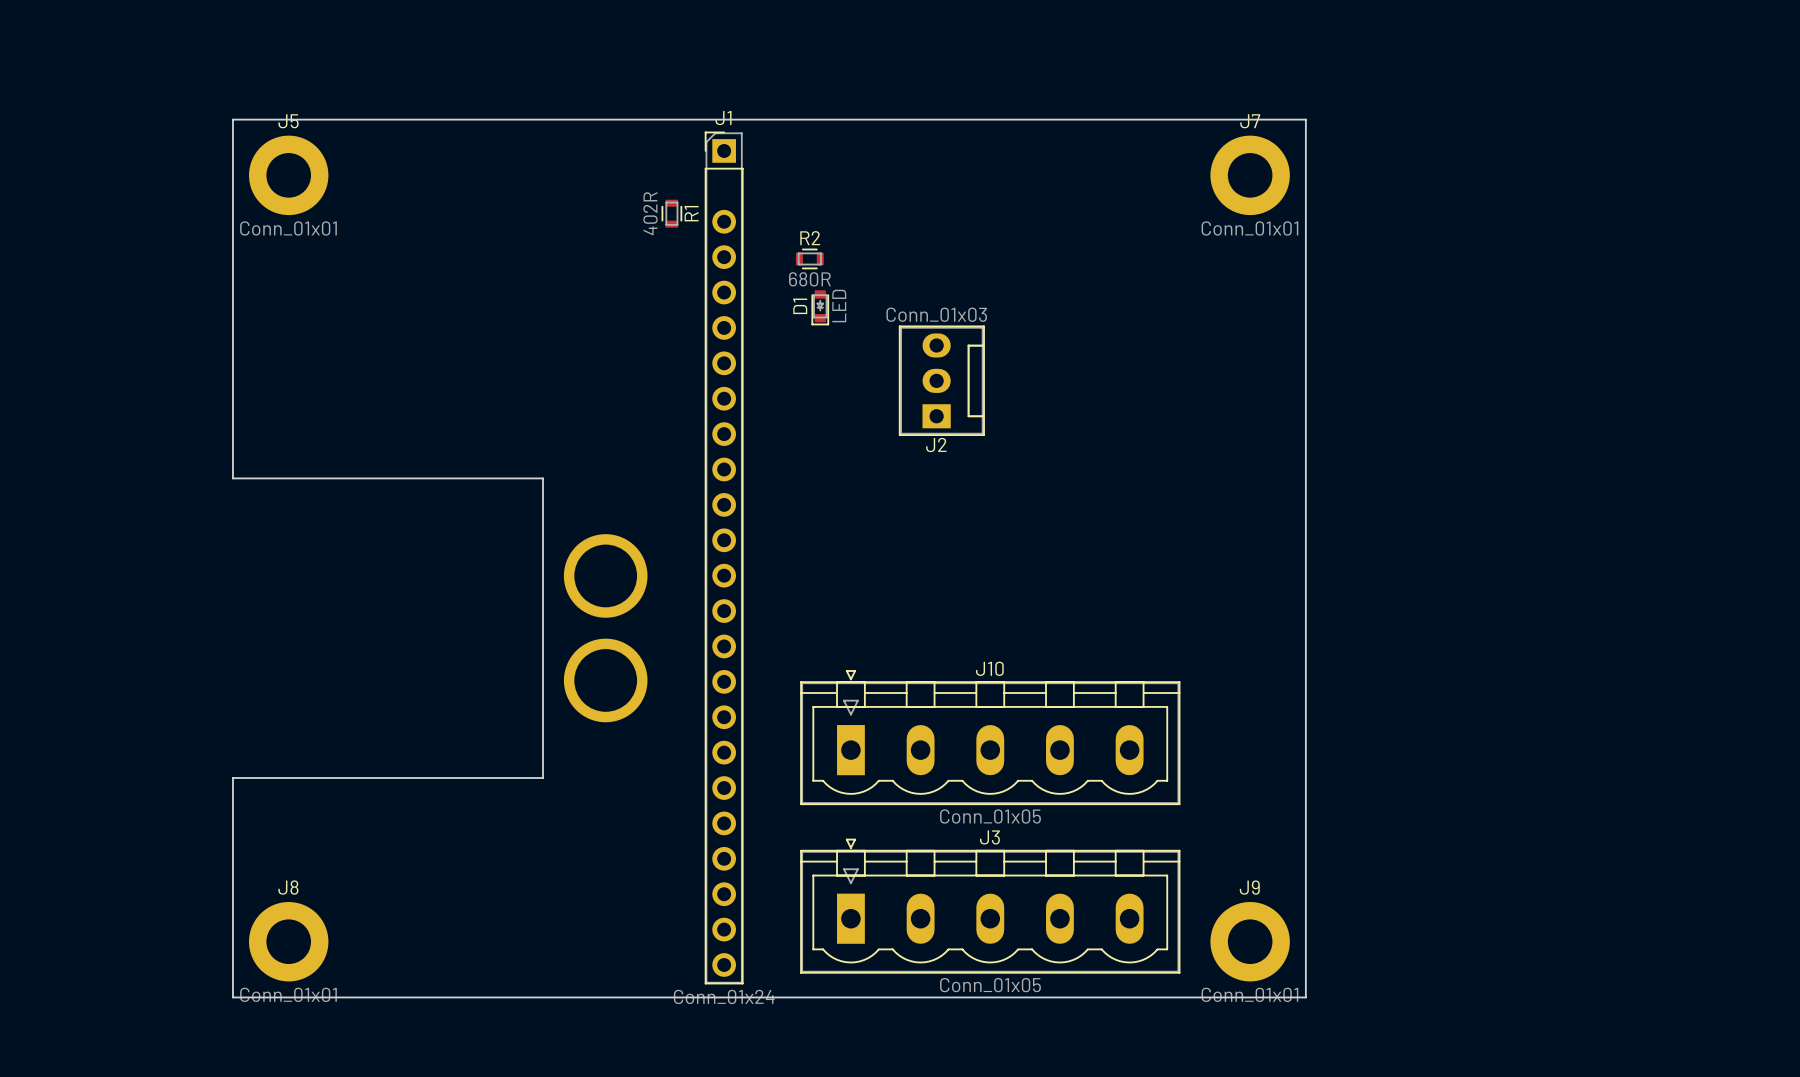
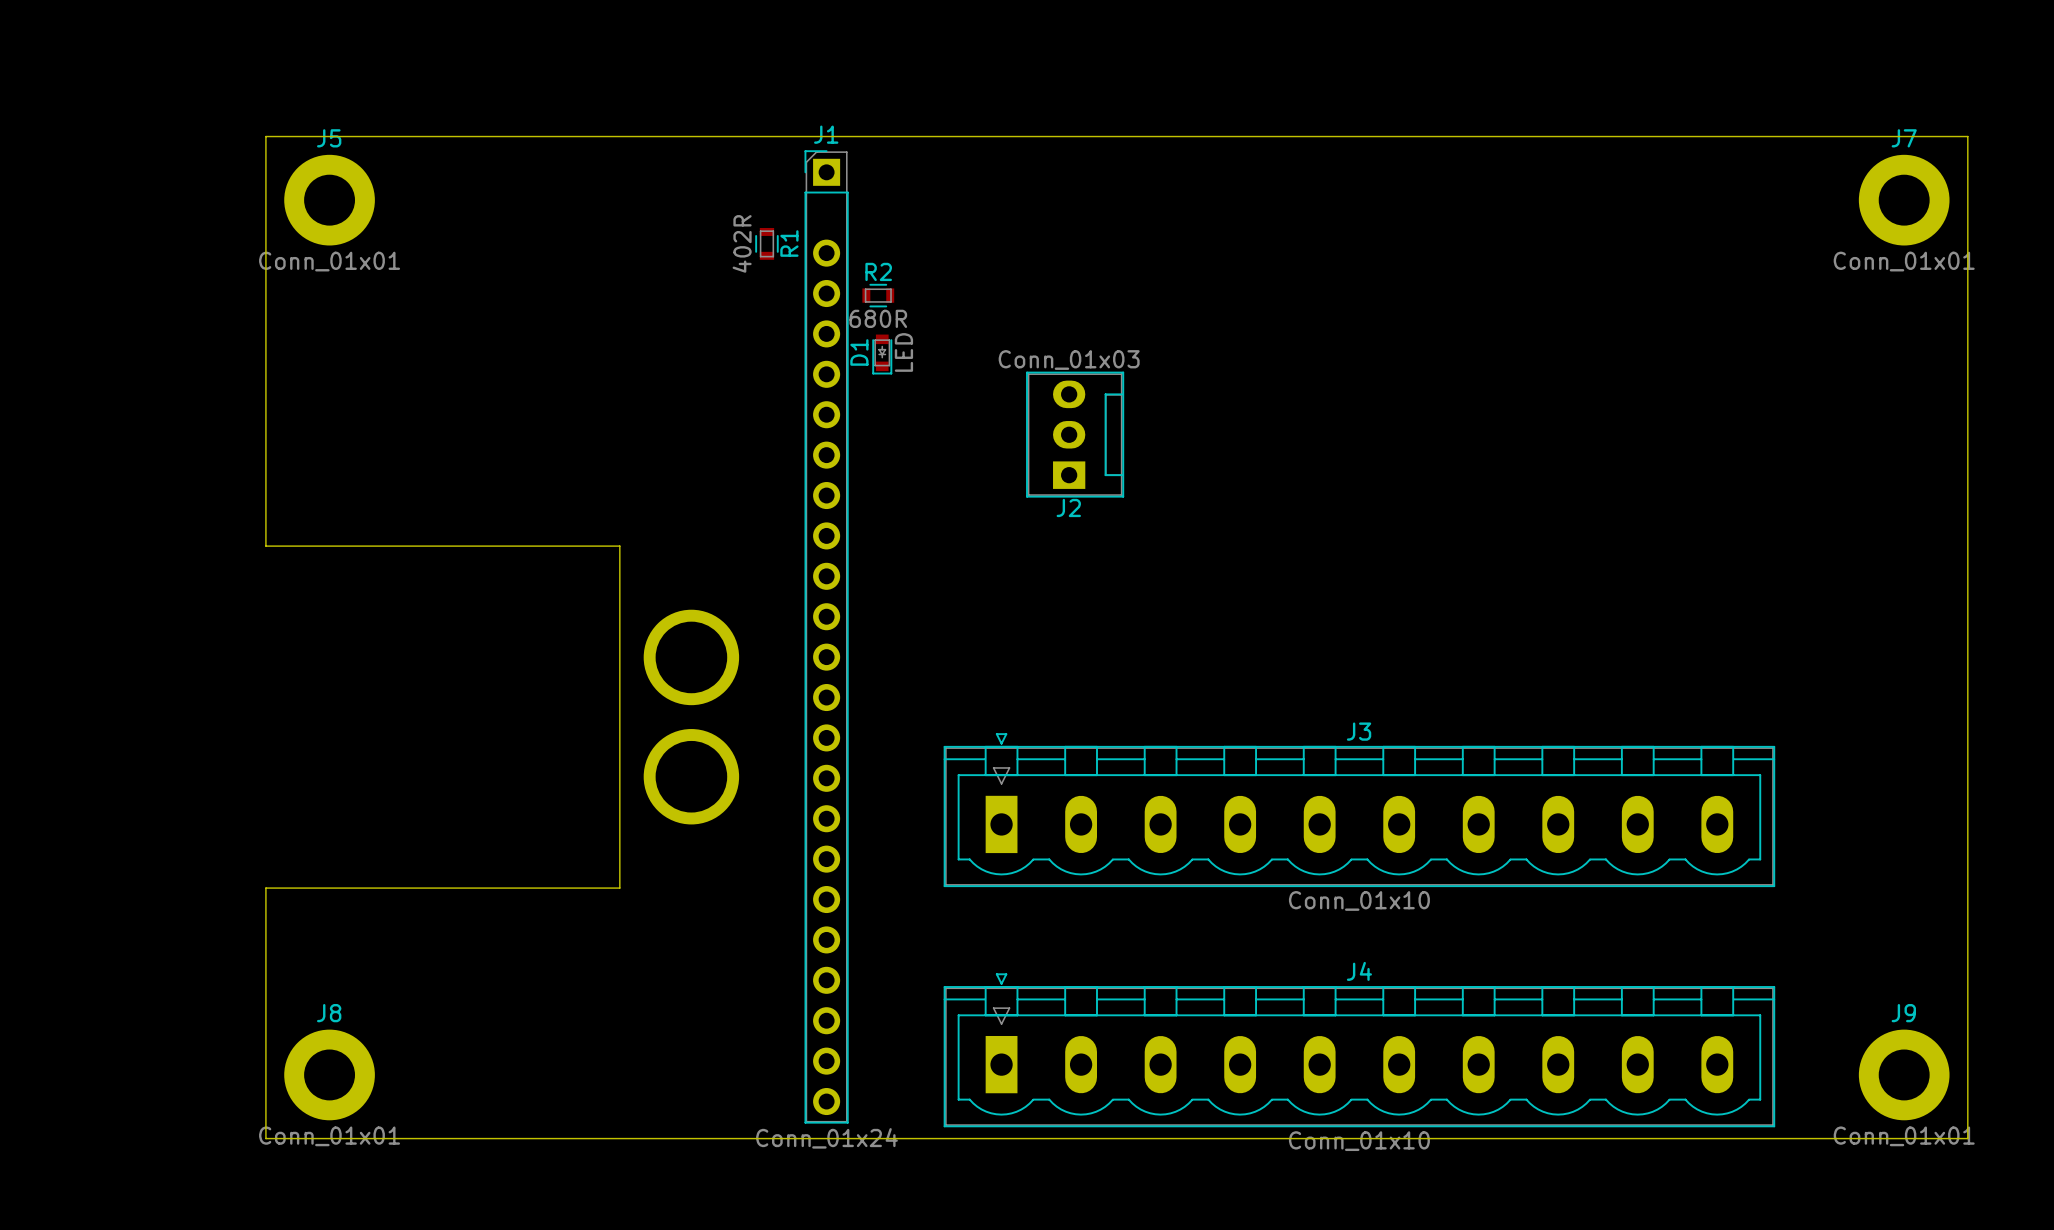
board edge: (1305, 119) (1305, 997) -> (1490, 136) (1967, 136) (1967, 1138) (1490, 1138)
J7 position: (1250, 175) -> (1904, 200)
R2 position: (809, 258) -> (878, 295)
D1 position: (820, 307) -> (882, 354)
J10: Conn_01x05 (990, 737) -> none
J3 footprint: [800, 838, 1181, 974] -> [943, 733, 1776, 888]
J4: none -> Conn_01x10 (1359, 1050)
J9 position: (1250, 941) -> (1904, 1074)
J3 value: Conn_01x05 (990, 985) -> Conn_01x10 (1359, 900)

